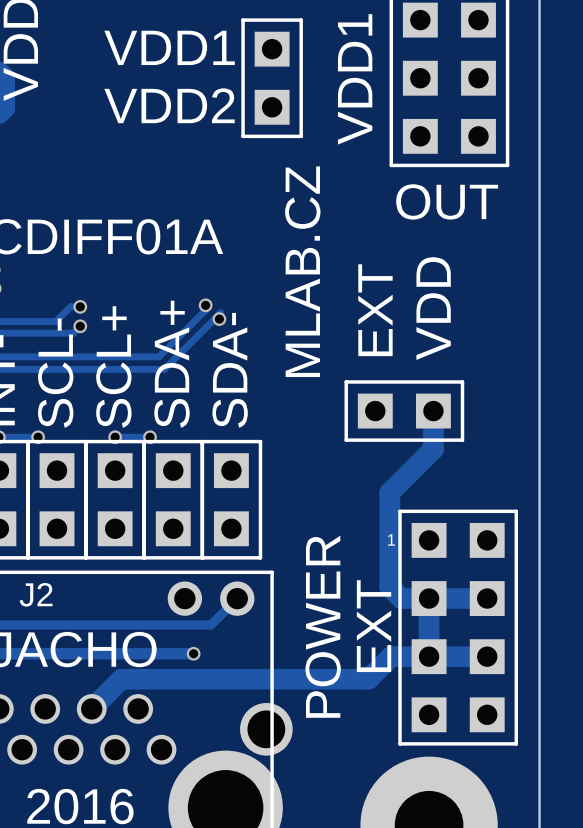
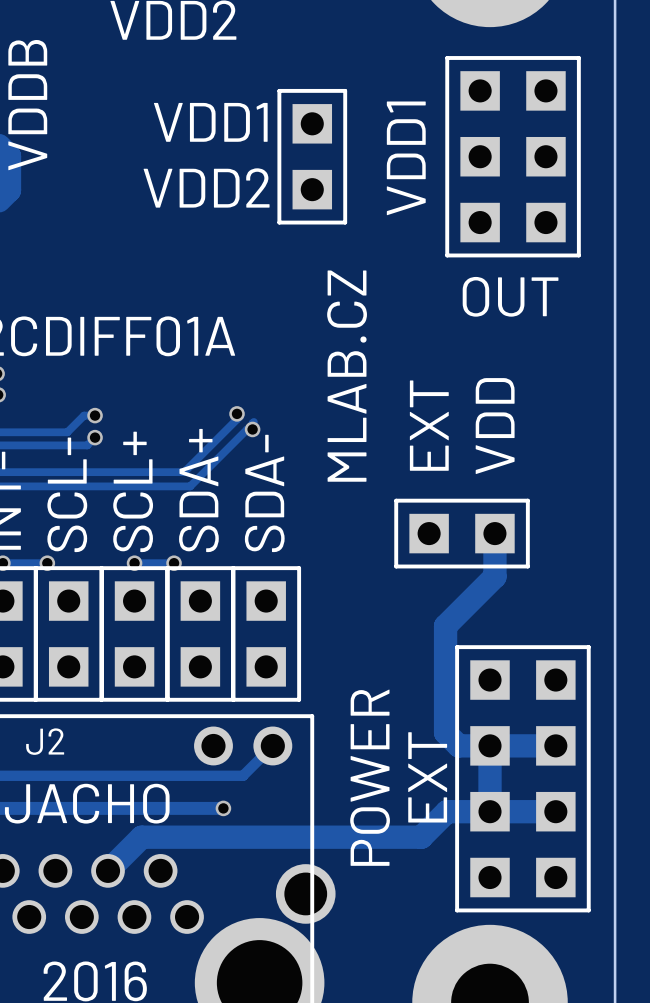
part text: 1 (391, 539) -> none

